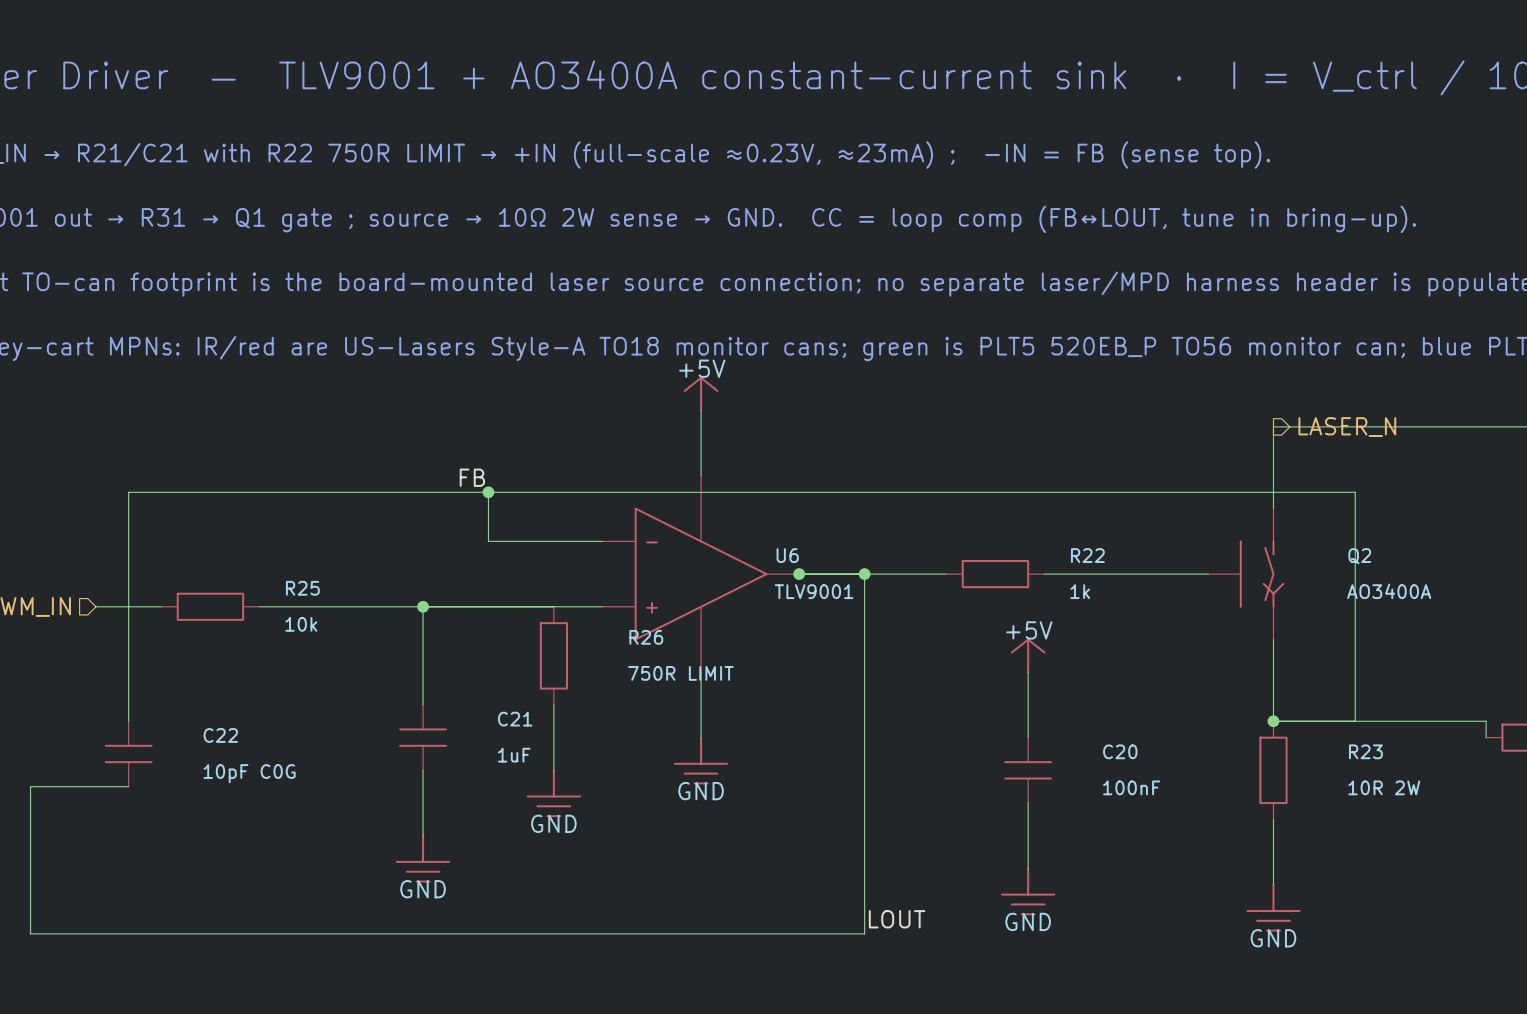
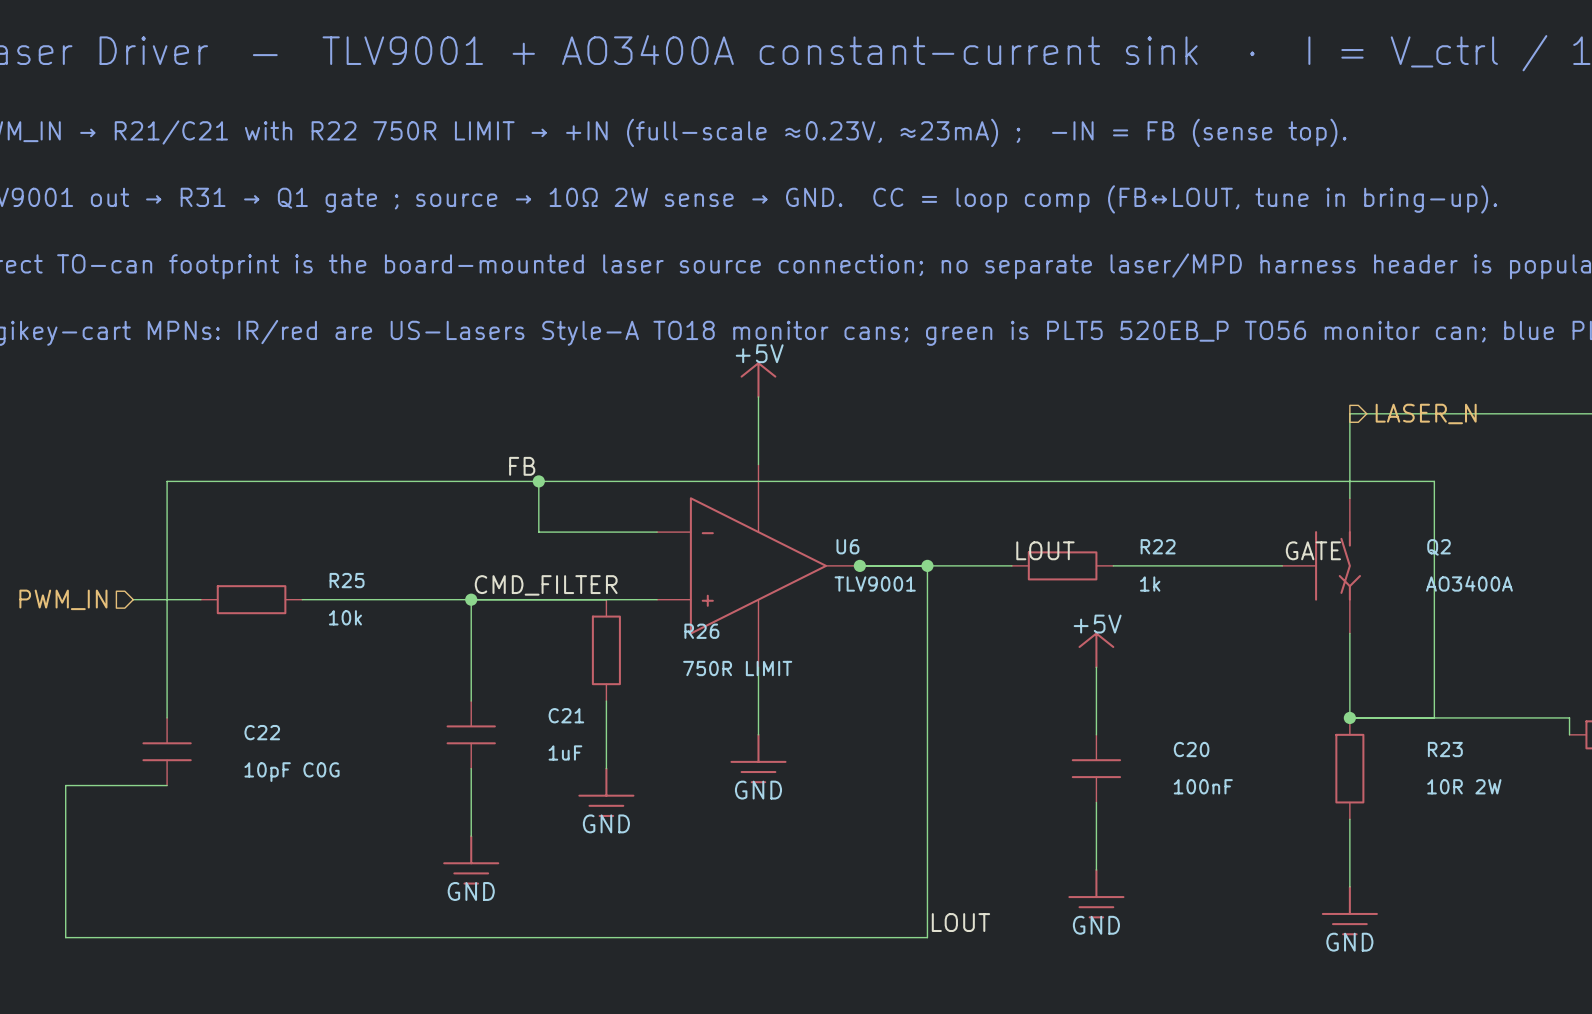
label: none -> LOUT (1045, 550)
label: none -> GATE (1313, 550)
label: none -> CMD_FILTER (546, 585)

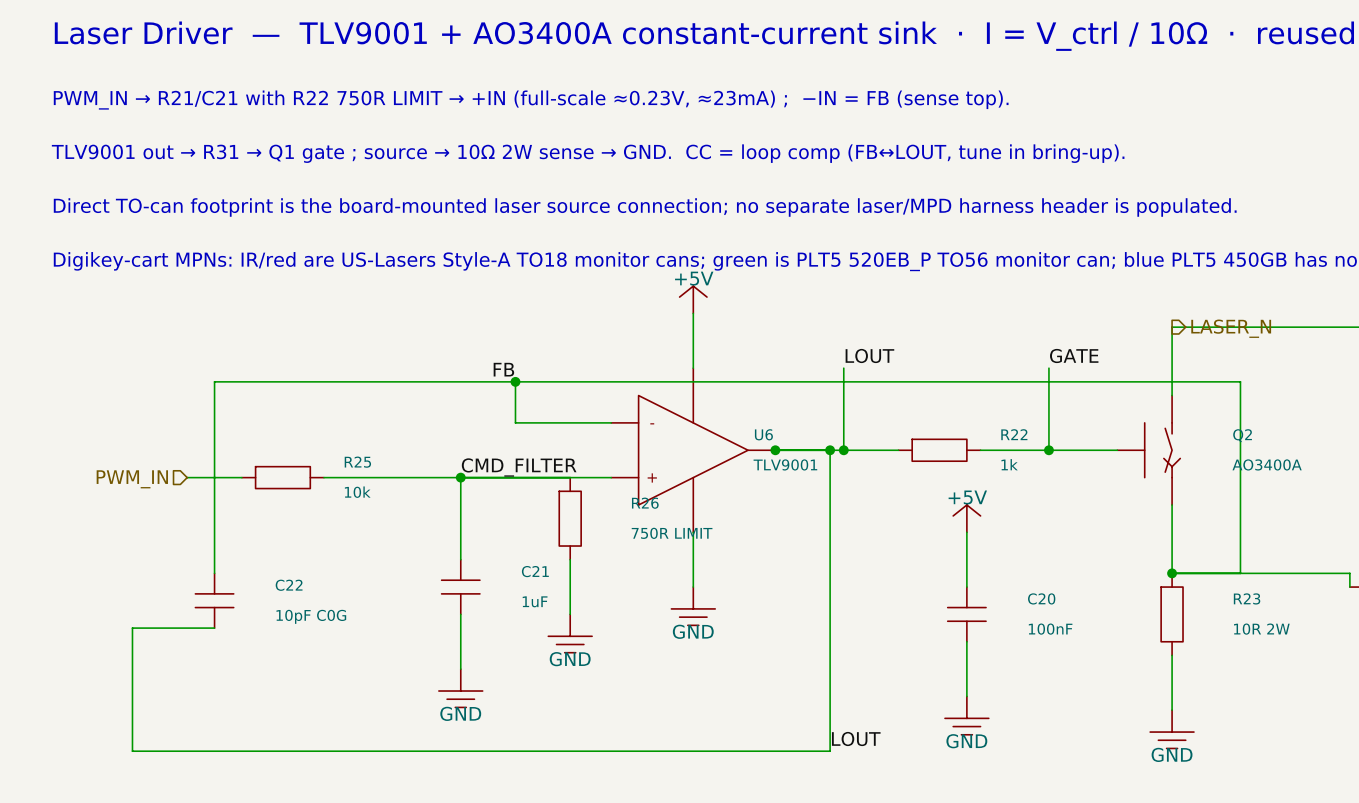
wire: none -> (843, 368) (843, 450)
wire: none -> (1048, 368) (1048, 450)
label position: LOUT (1045, 550) -> LOUT (869, 355)
label position: GATE (1313, 550) -> GATE (1074, 355)
junction: none -> (843, 450)
junction: none -> (1048, 450)

